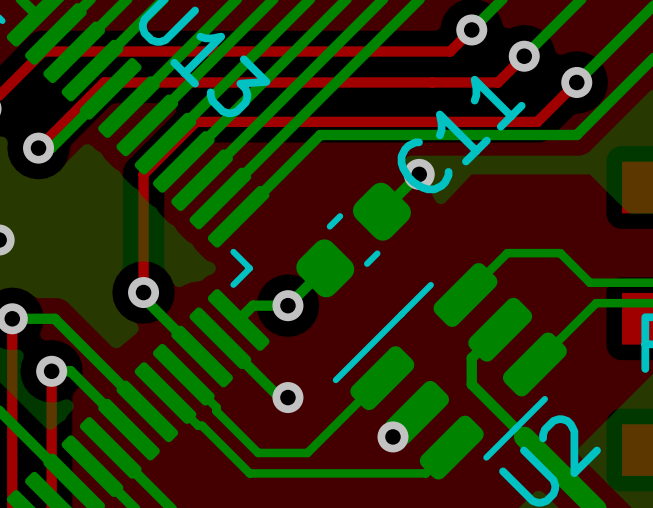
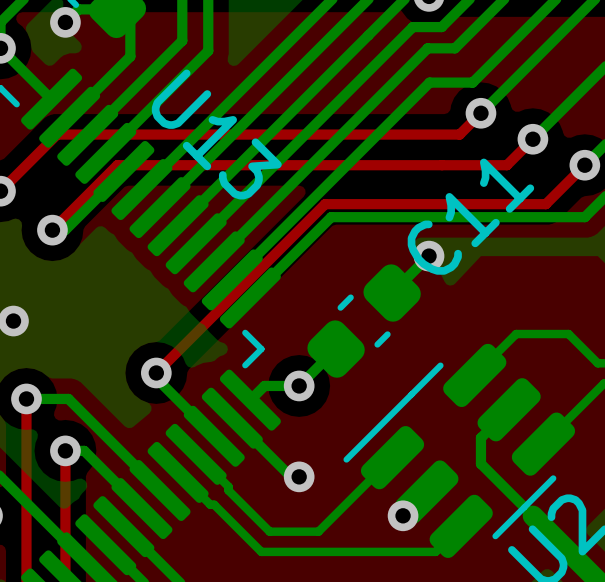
top track: (314, 121) (196, 121) (143, 174) (143, 292) -> (325, 204) (156, 372)

